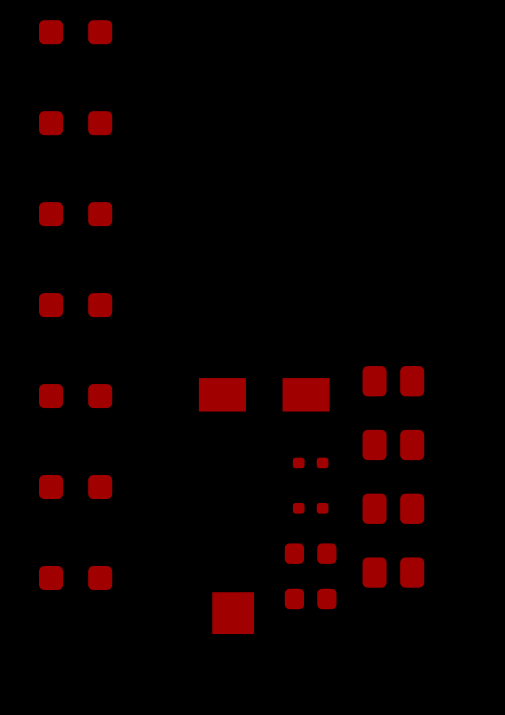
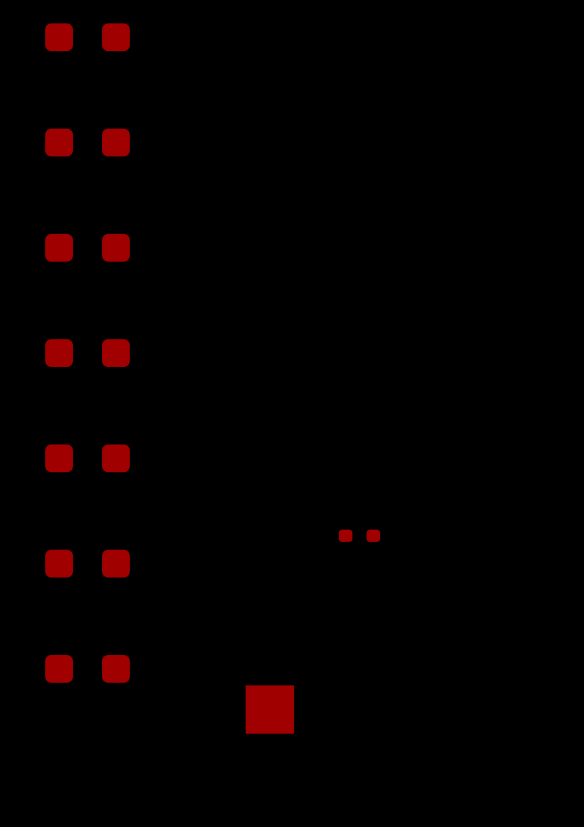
part: (393, 381) -> none
part: (264, 394) -> none
part: (393, 444) -> none
part: (310, 508) -> none
part: (393, 508) -> none
part: (310, 553) -> none
part: (393, 572) -> none
part: (310, 599) -> none

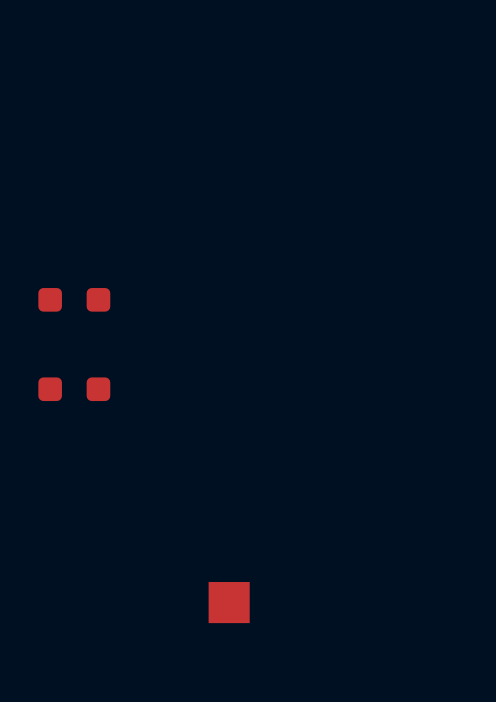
part: (87, 37) -> none
part: (87, 142) -> none
part: (87, 247) -> none
part: (359, 535) -> none
part: (87, 563) -> none
part: (87, 668) -> none

